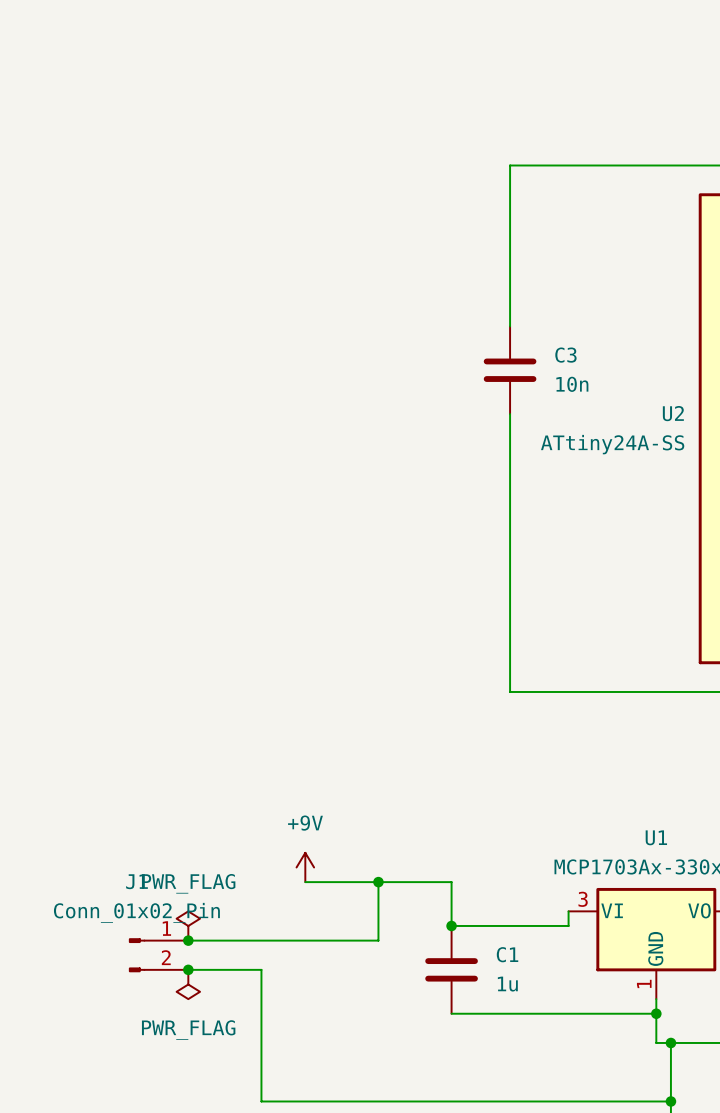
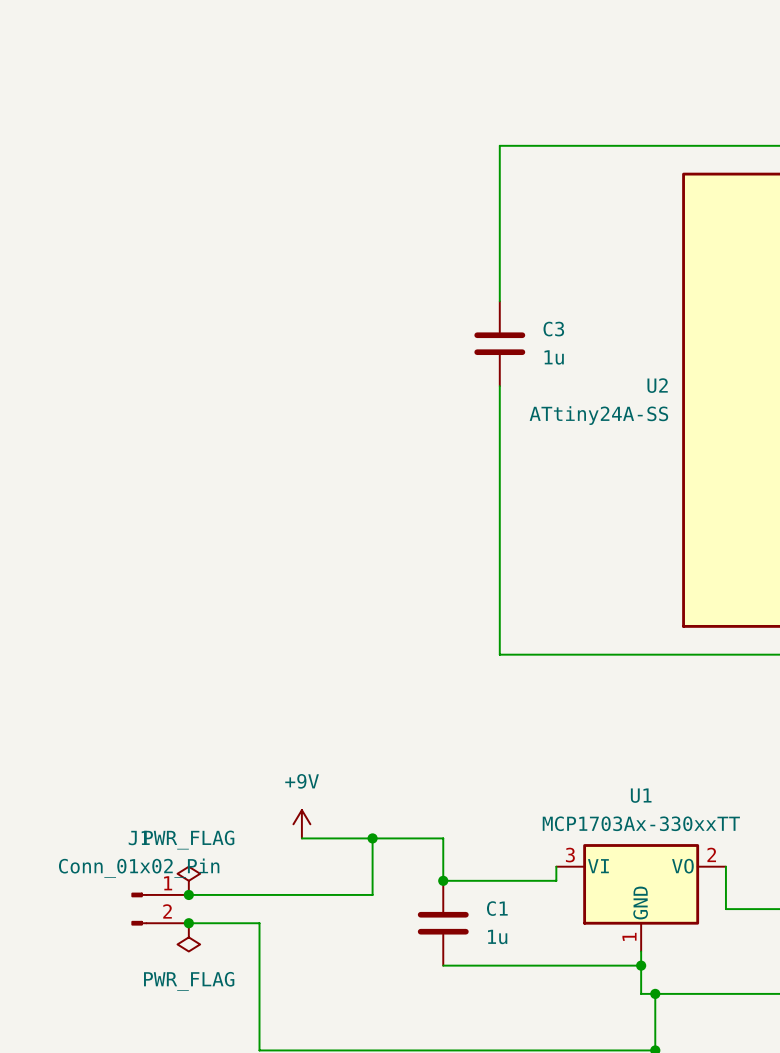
C3 value: 10n (572, 384) -> 1u (554, 357)

